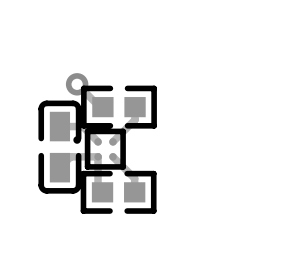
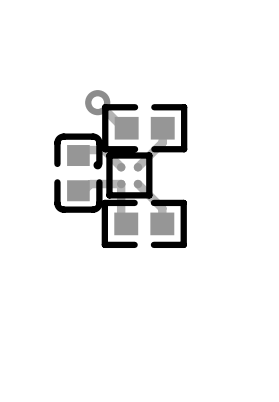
part footprint: [38, 100, 82, 194] -> [54, 133, 103, 213]

